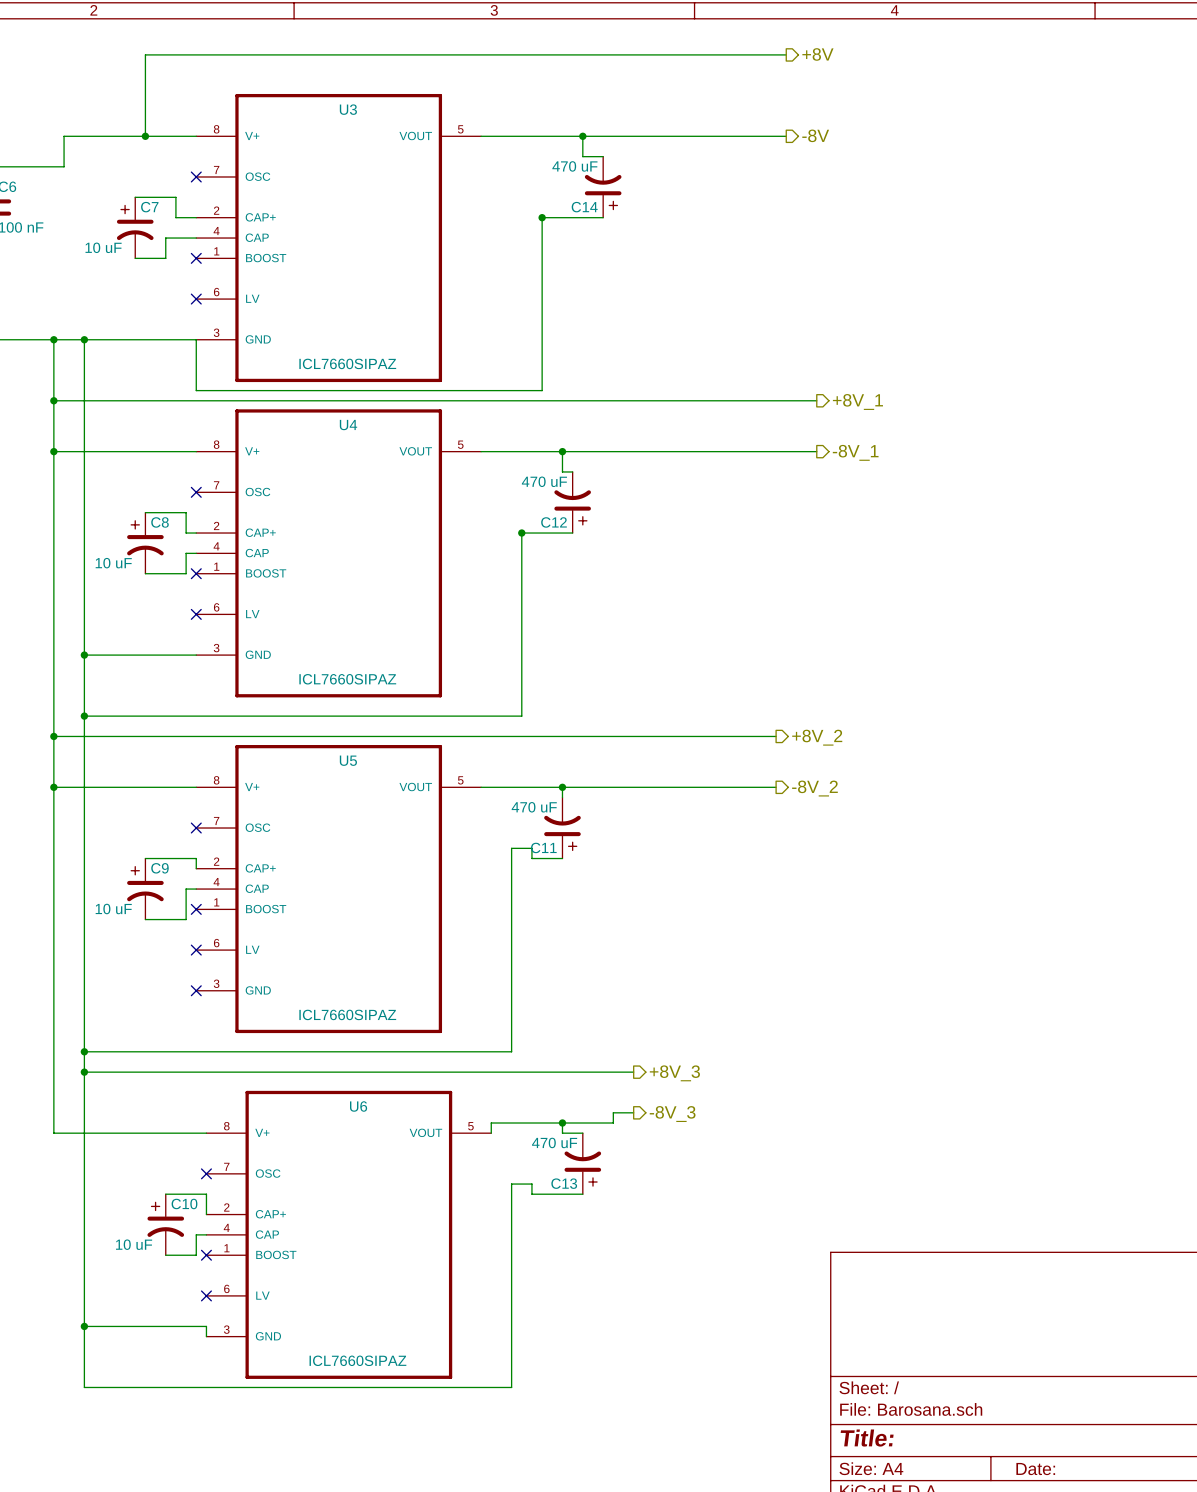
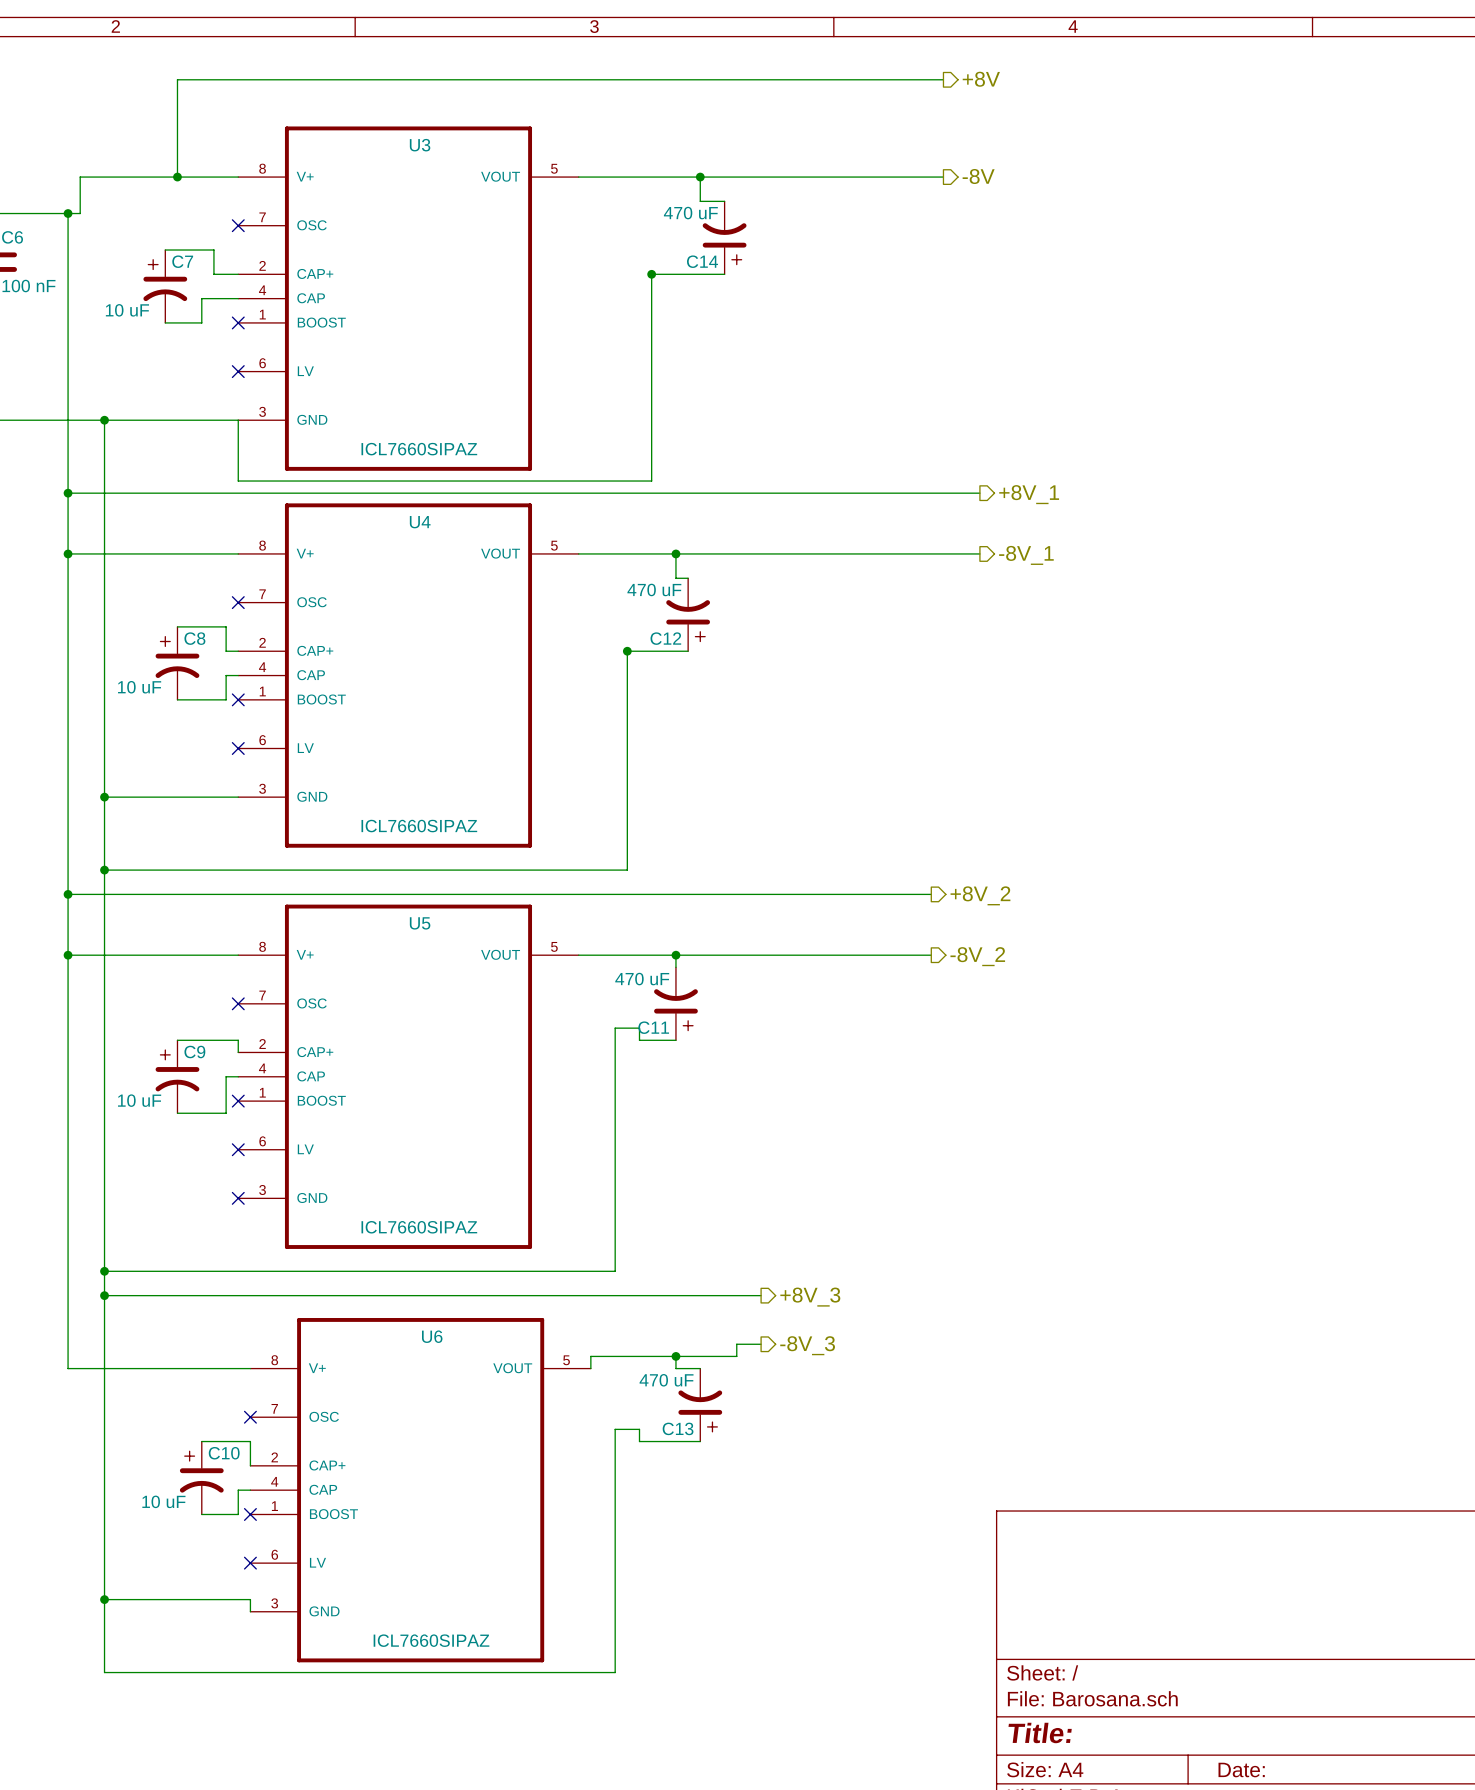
wire: none -> (68, 213) (68, 420)
junction: none -> (68, 213)
junction: (53, 339) -> none

